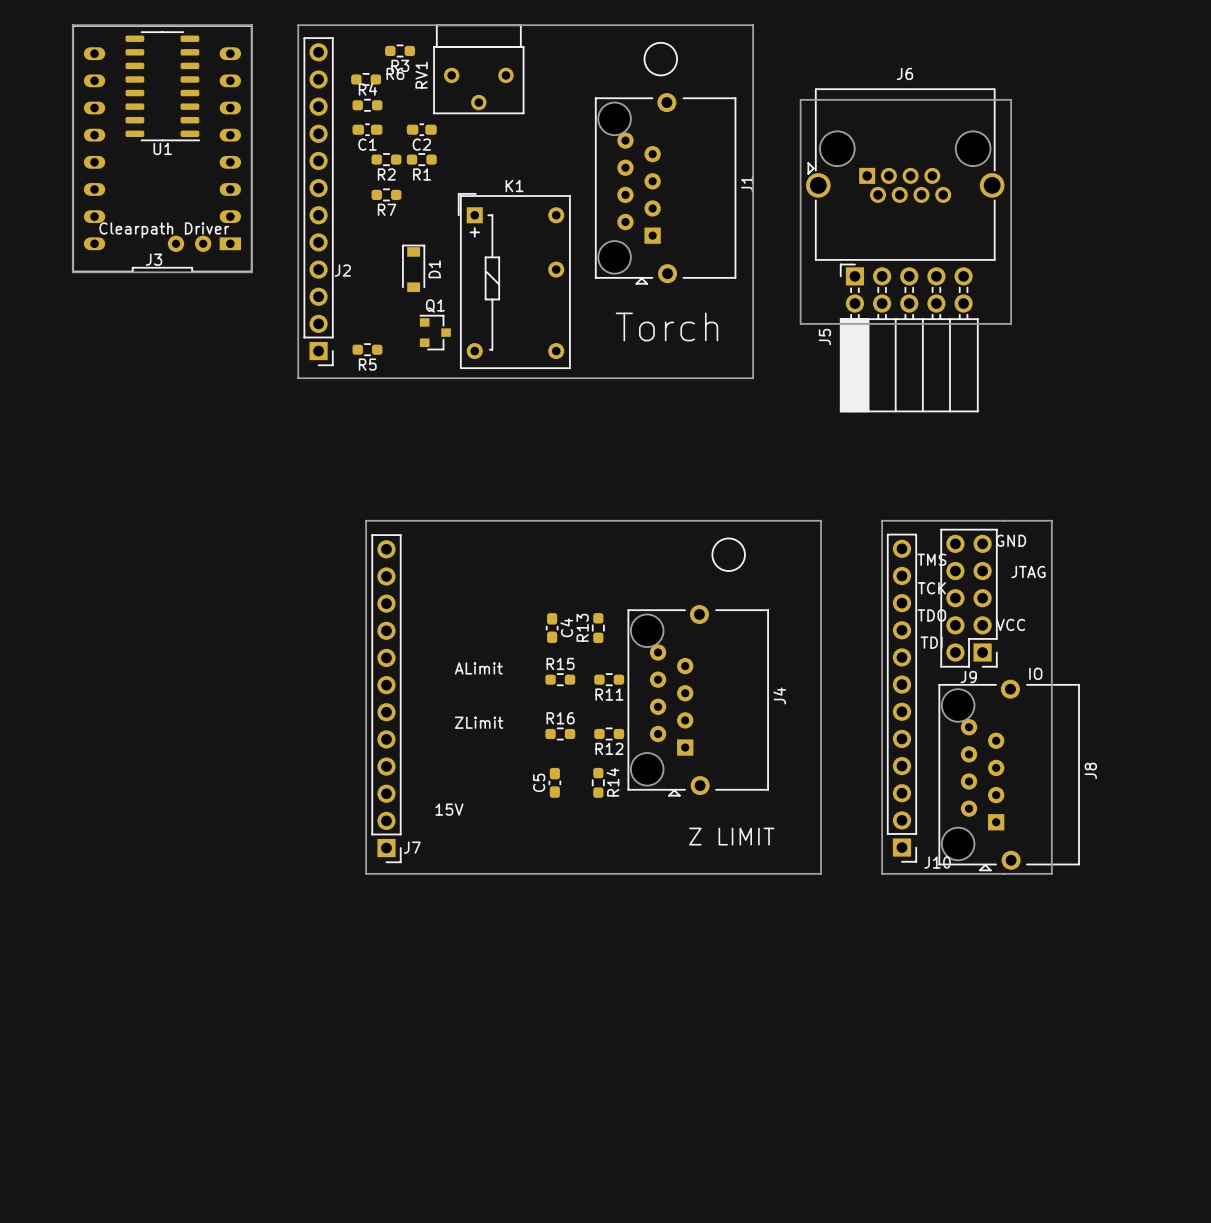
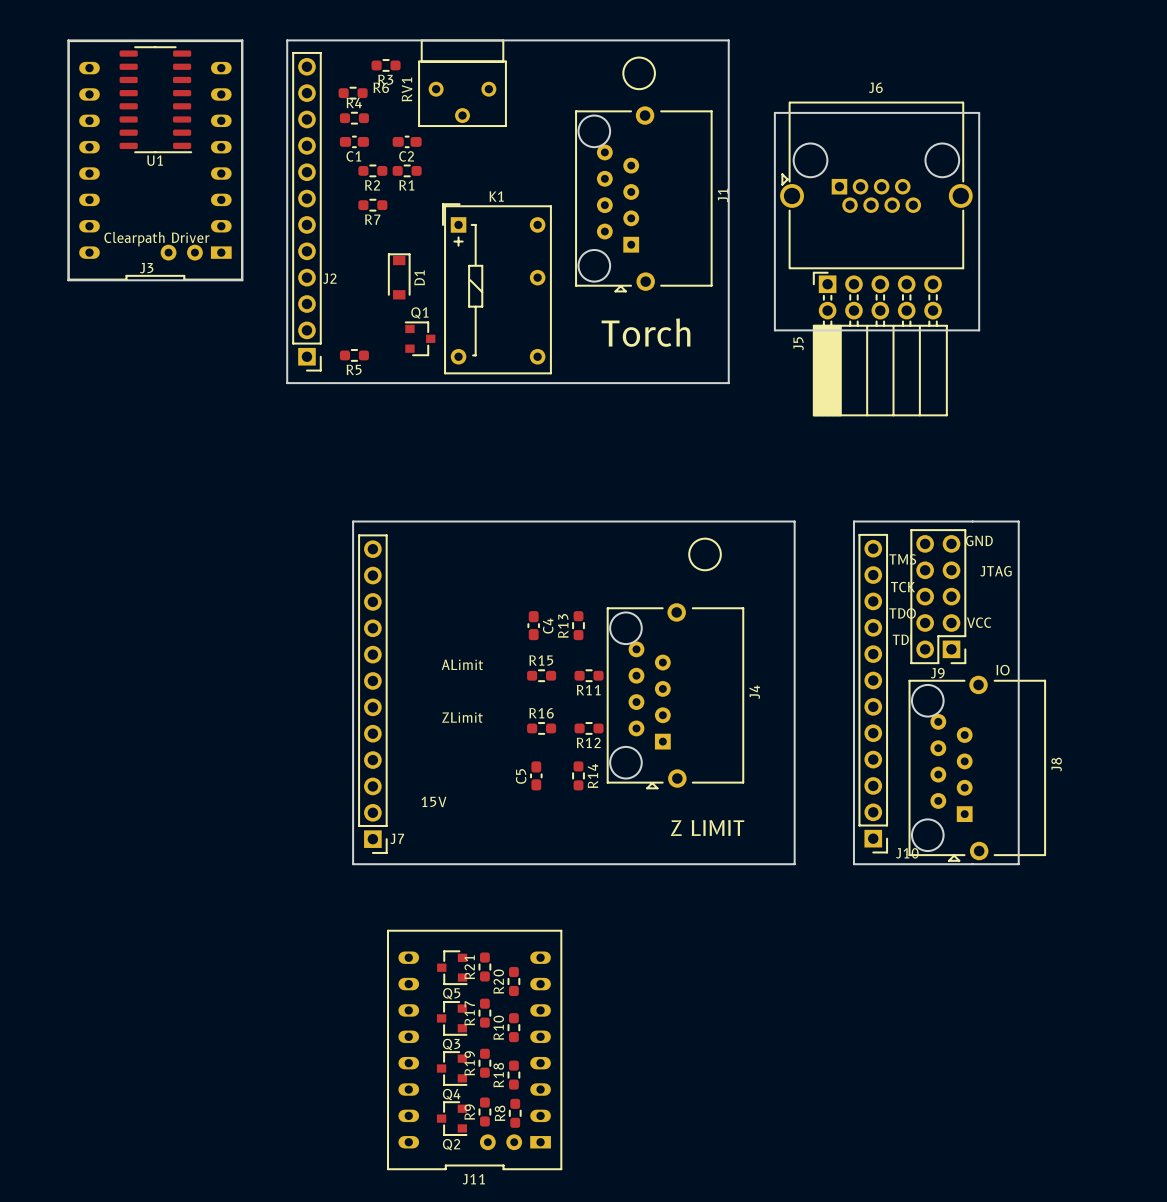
R21: none -> (484, 967)
Q5: none -> (452, 967)
R20: none -> (513, 981)
R17: none -> (484, 1013)
Q3: none -> (452, 1018)
R10: none -> (513, 1027)
J11: none -> (474, 1049)
R19: none -> (484, 1063)
Q4: none -> (452, 1068)
R18: none -> (513, 1075)
R9: none -> (484, 1112)
R8: none -> (515, 1113)
Q2: none -> (452, 1118)

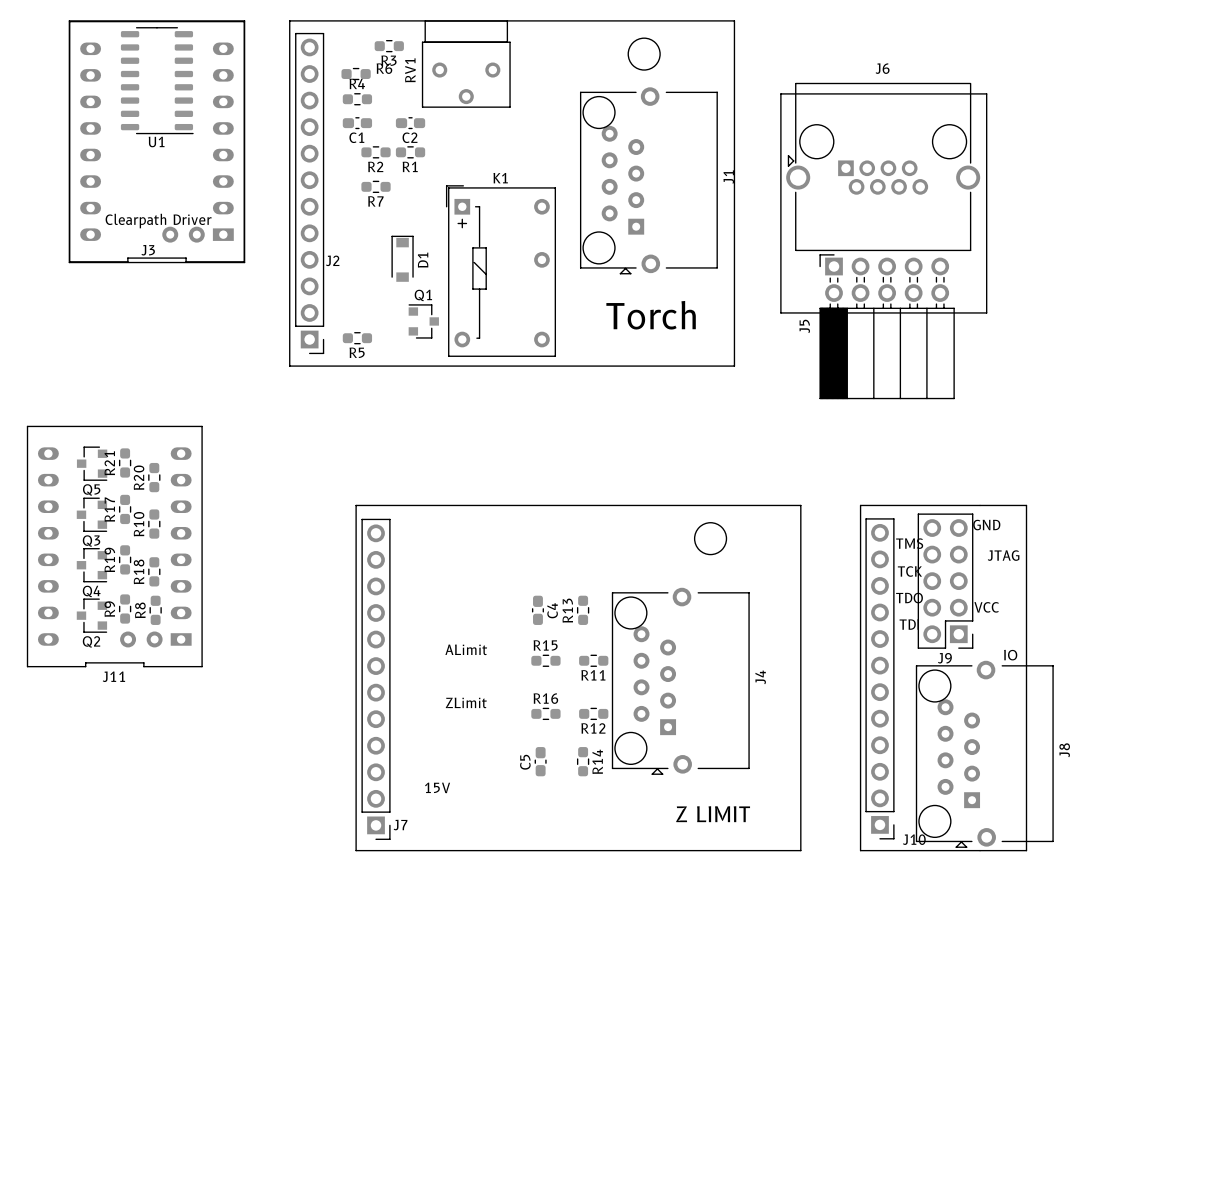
Q5 position: (452, 967) -> (92, 463)
R21 position: (484, 967) -> (125, 462)
R20 position: (513, 981) -> (154, 477)
R17 position: (484, 1013) -> (125, 509)
Q3 position: (452, 1018) -> (91, 514)
R10 position: (513, 1027) -> (154, 524)
J11 position: (474, 1049) -> (114, 546)
R19 position: (484, 1063) -> (125, 559)
Q4 position: (452, 1068) -> (91, 565)
R18 position: (513, 1075) -> (154, 571)
R9 position: (484, 1112) -> (125, 609)
R8 position: (515, 1113) -> (155, 610)
Q2 position: (452, 1118) -> (91, 615)

